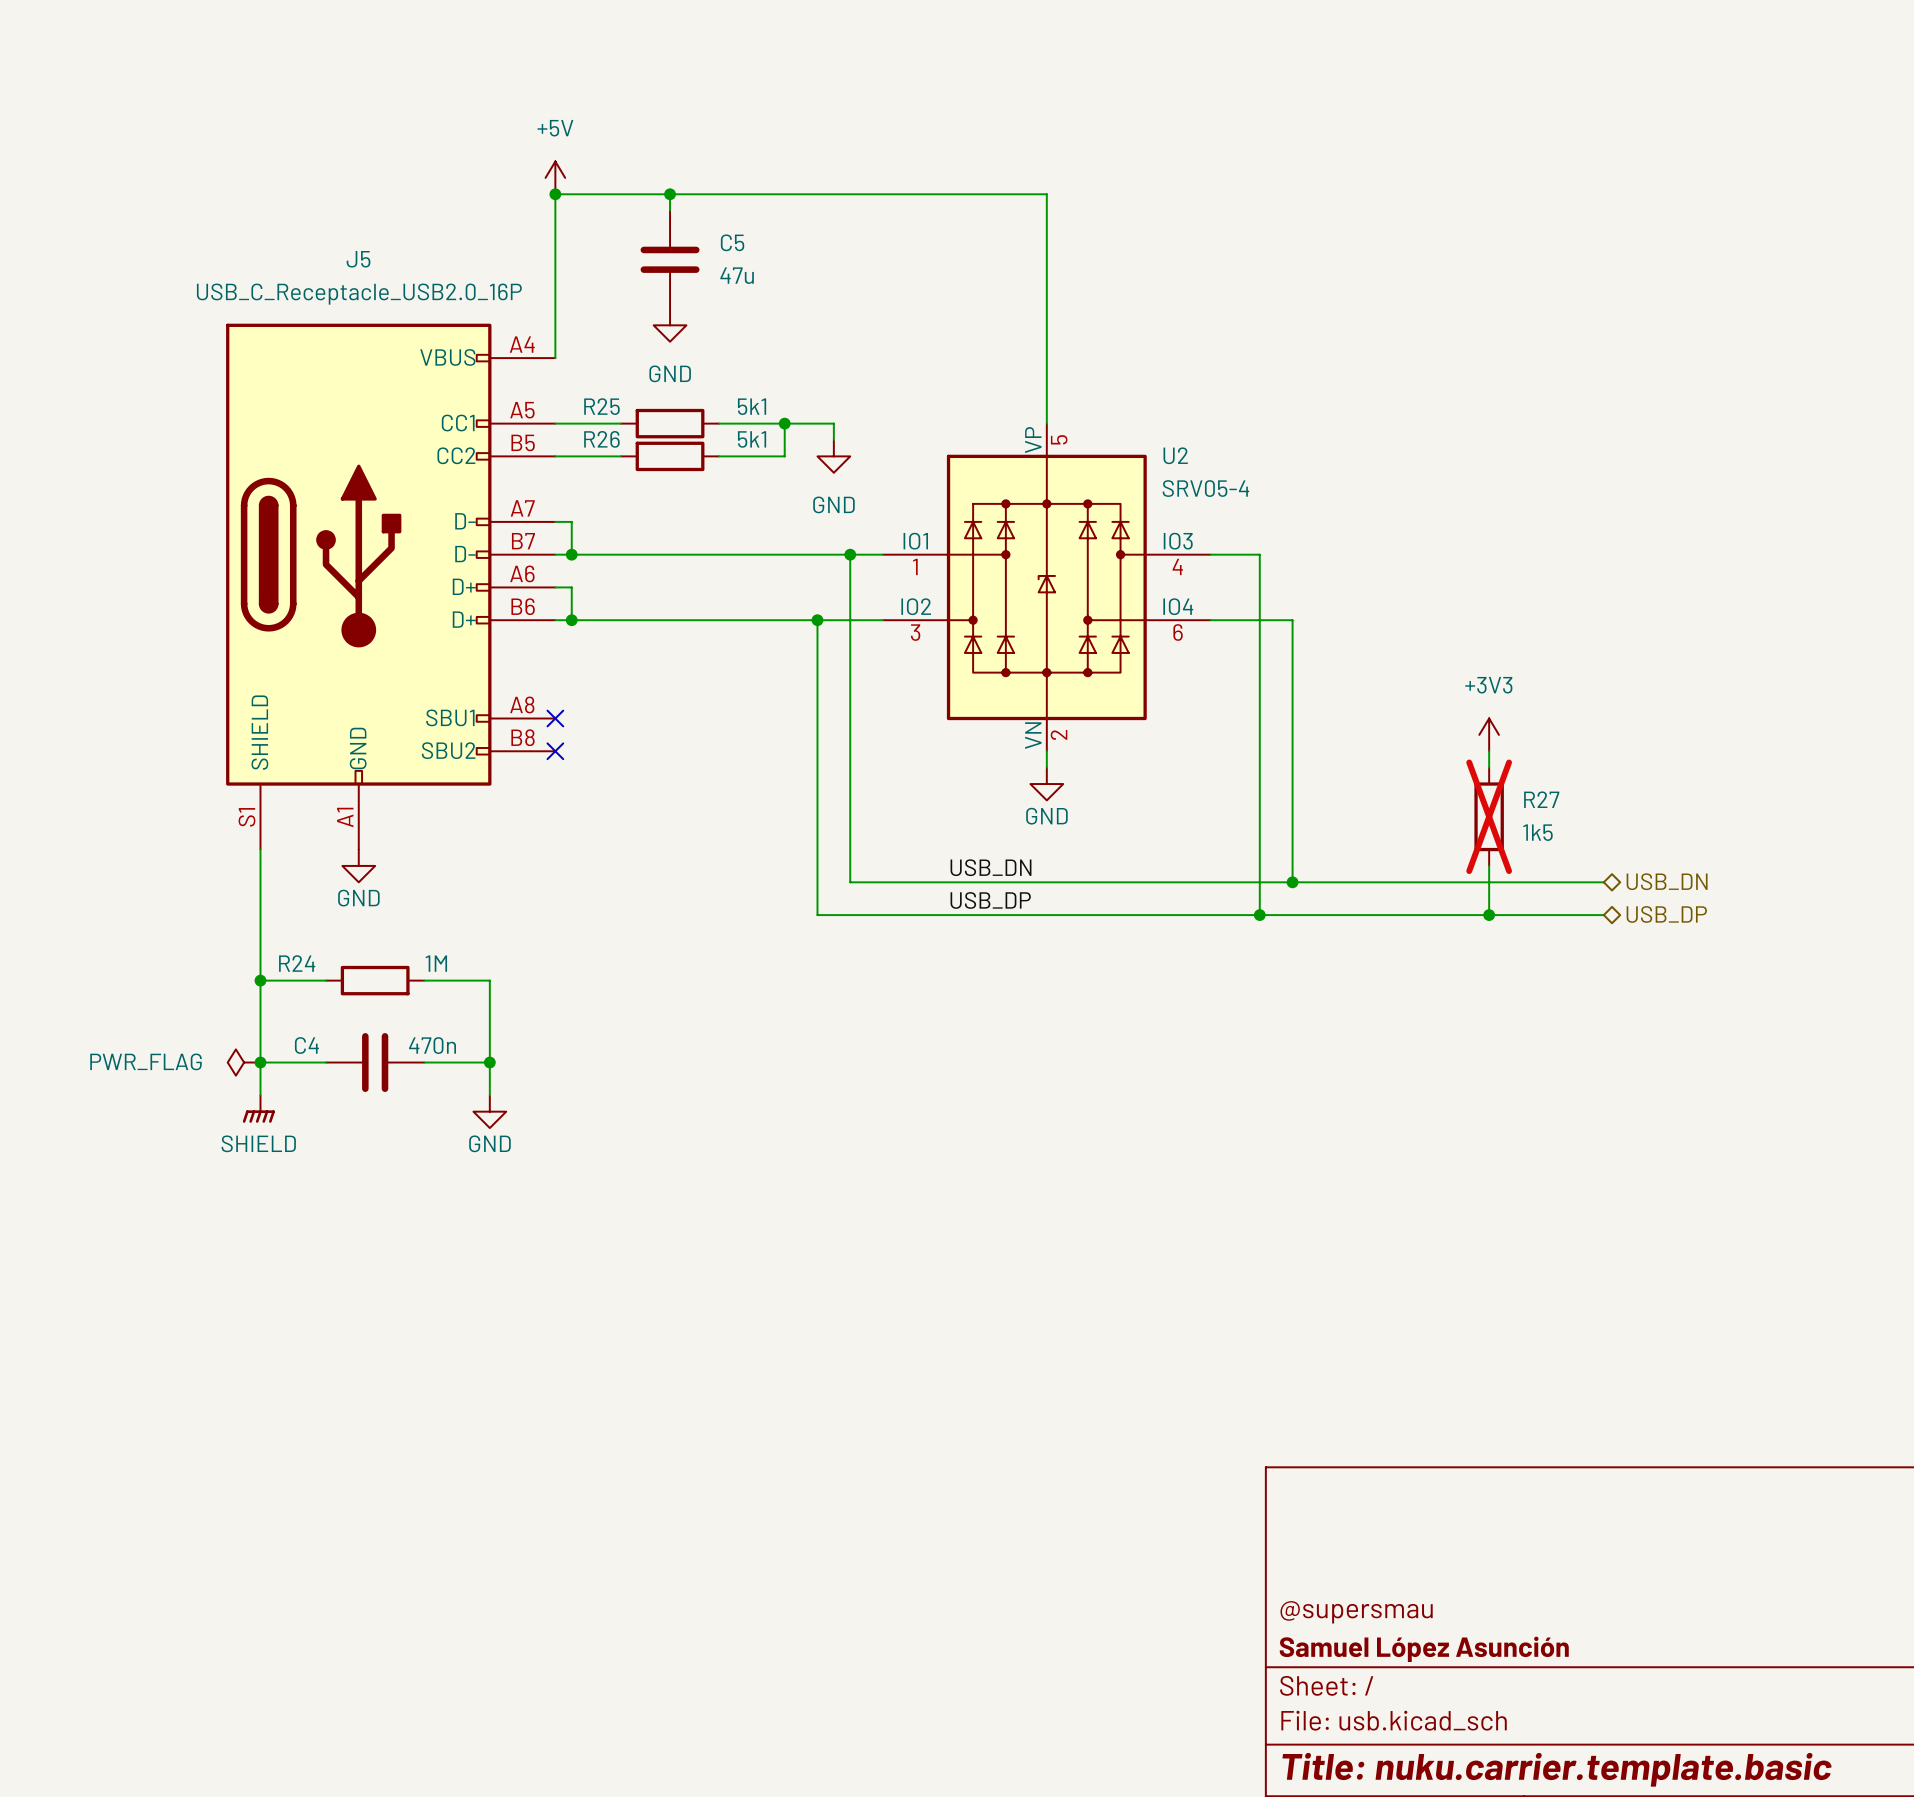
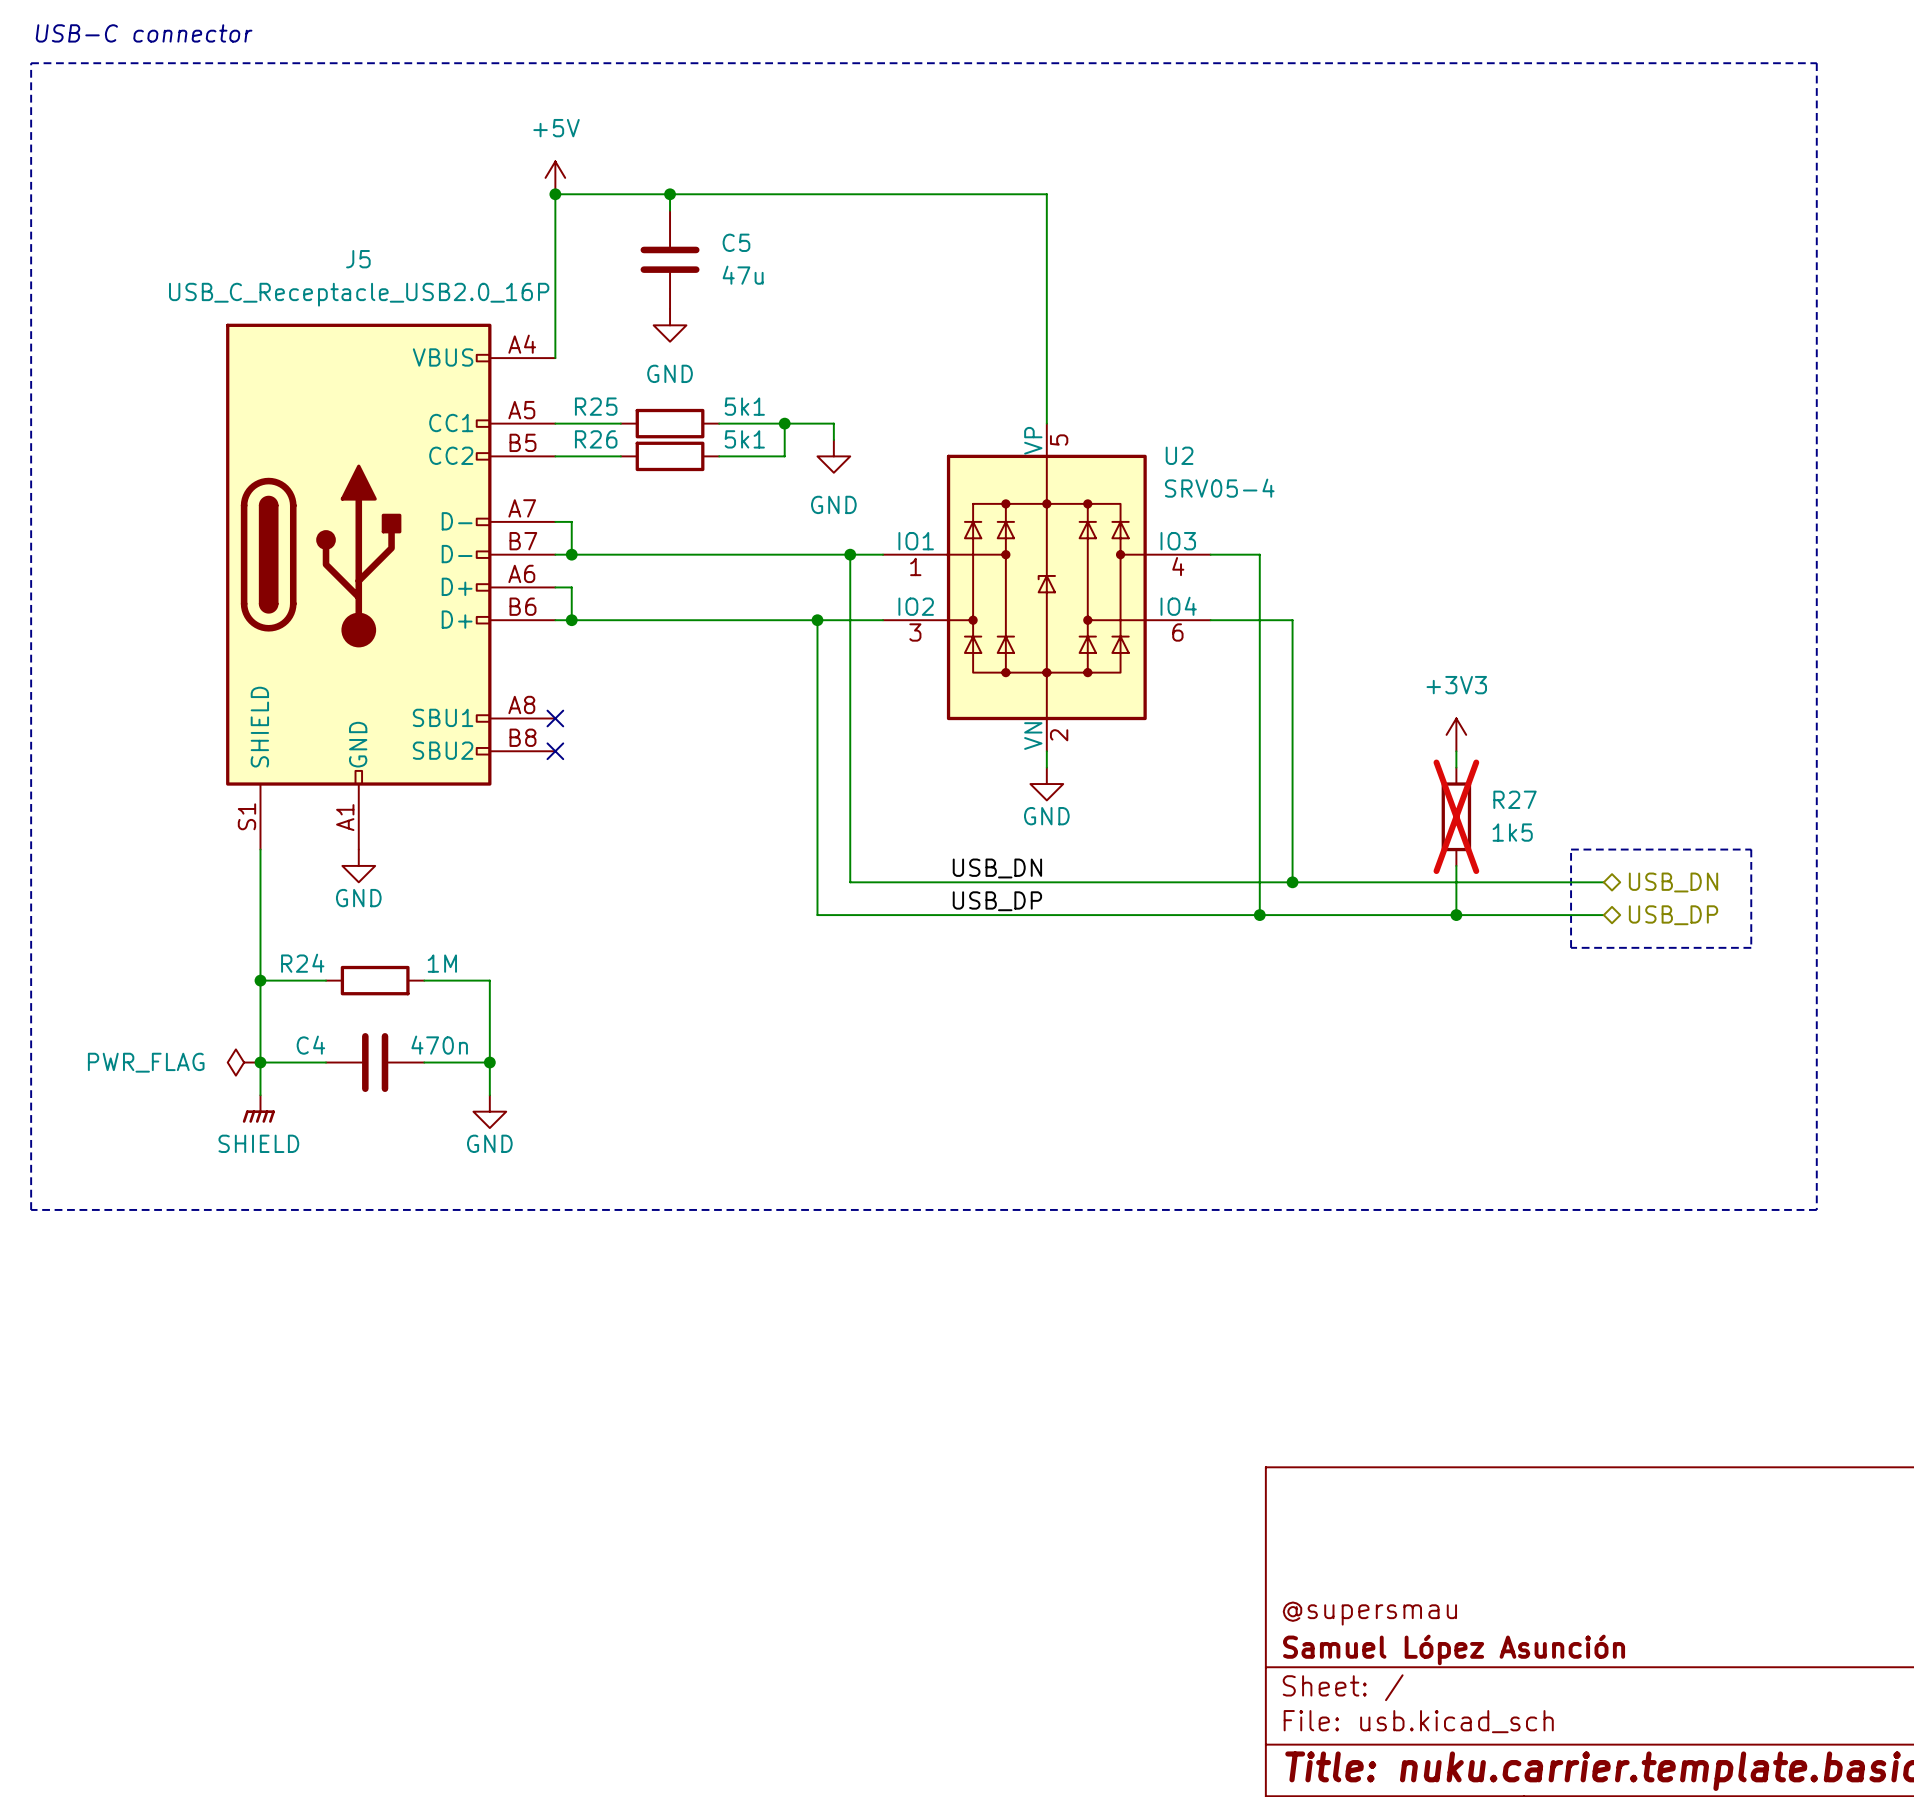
text: none -> USB-C connector (144, 33)
line: none -> (31, 63) (1816, 63) (1816, 1209) (31, 1209) (31, 63)
power symbol position: +3V3 (1489, 734) -> +3V3 (1456, 734)
wire: (1489, 751) (1489, 767) -> (1456, 751) (1456, 767)
R27 position: (1489, 816) -> (1456, 816)
line: none -> (1571, 849) (1751, 849) (1751, 947) (1571, 947) (1571, 849)
wire: (1489, 865) (1489, 915) -> (1456, 865) (1456, 915)
junction position: (1489, 915) -> (1456, 915)

